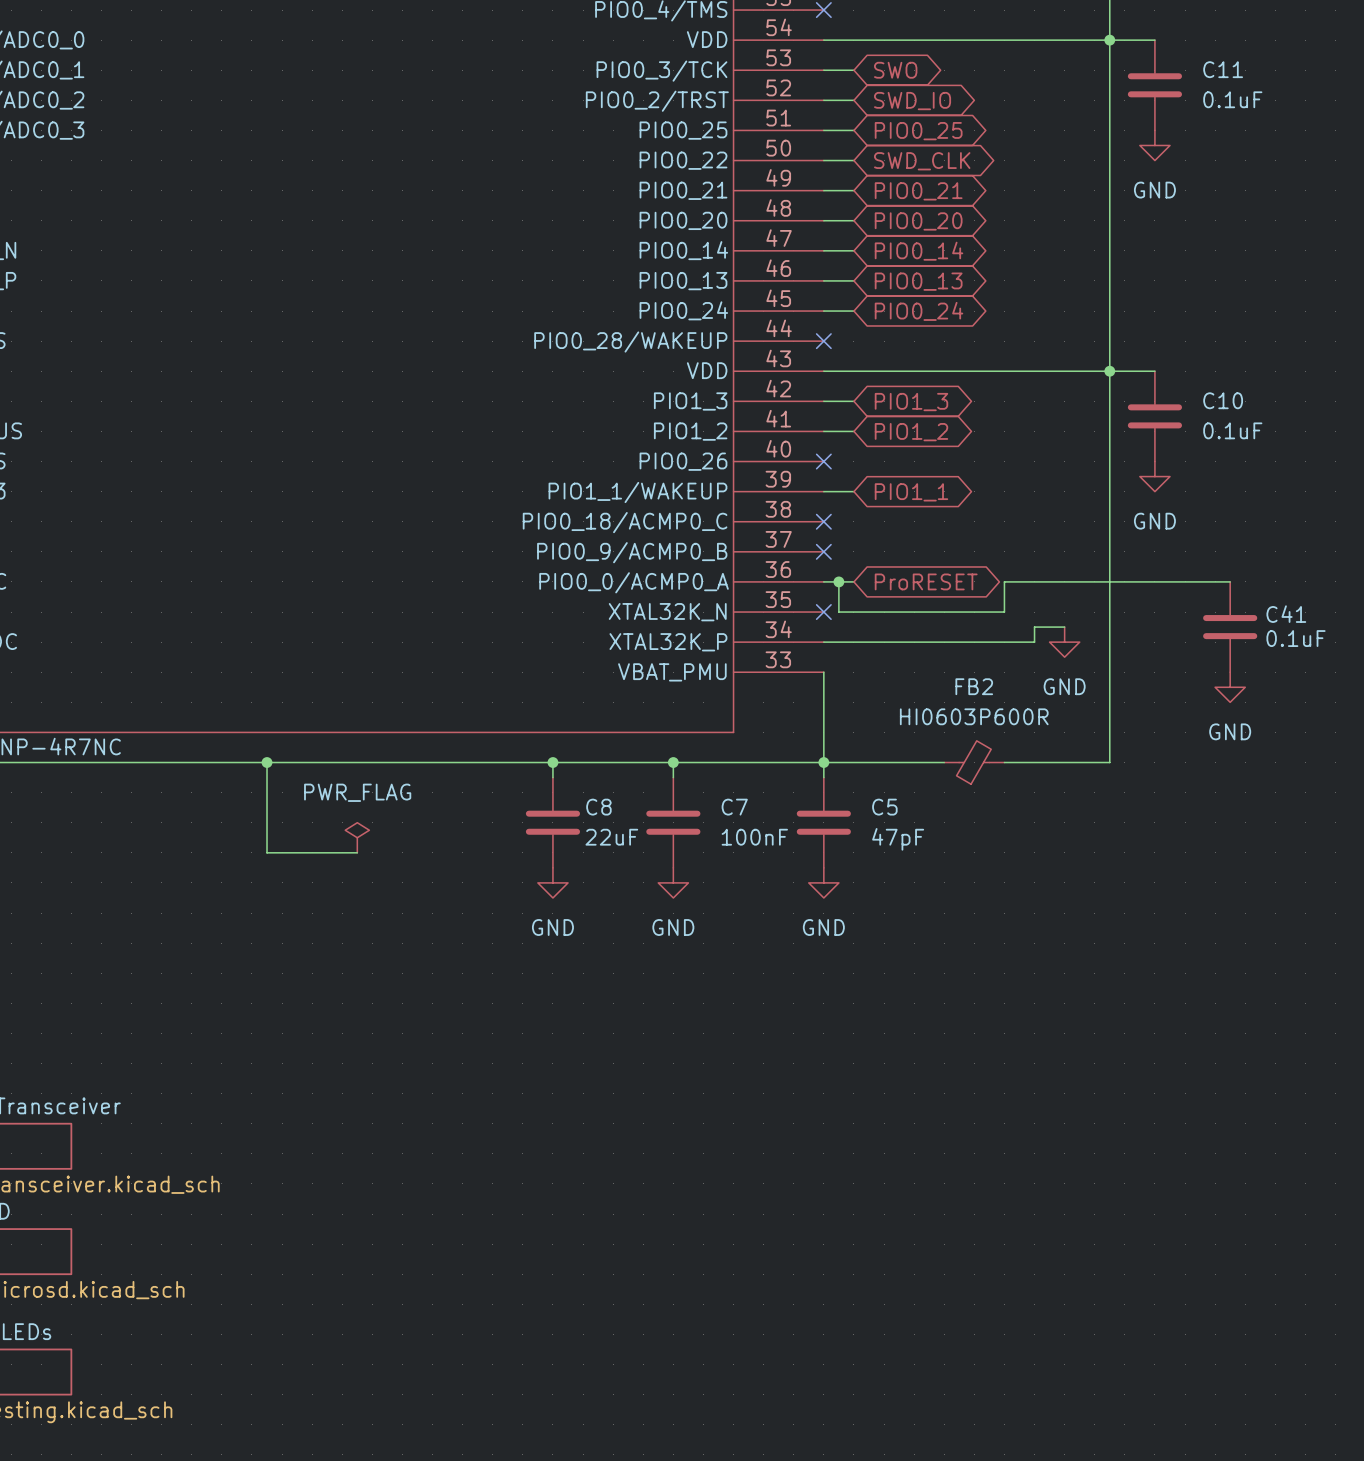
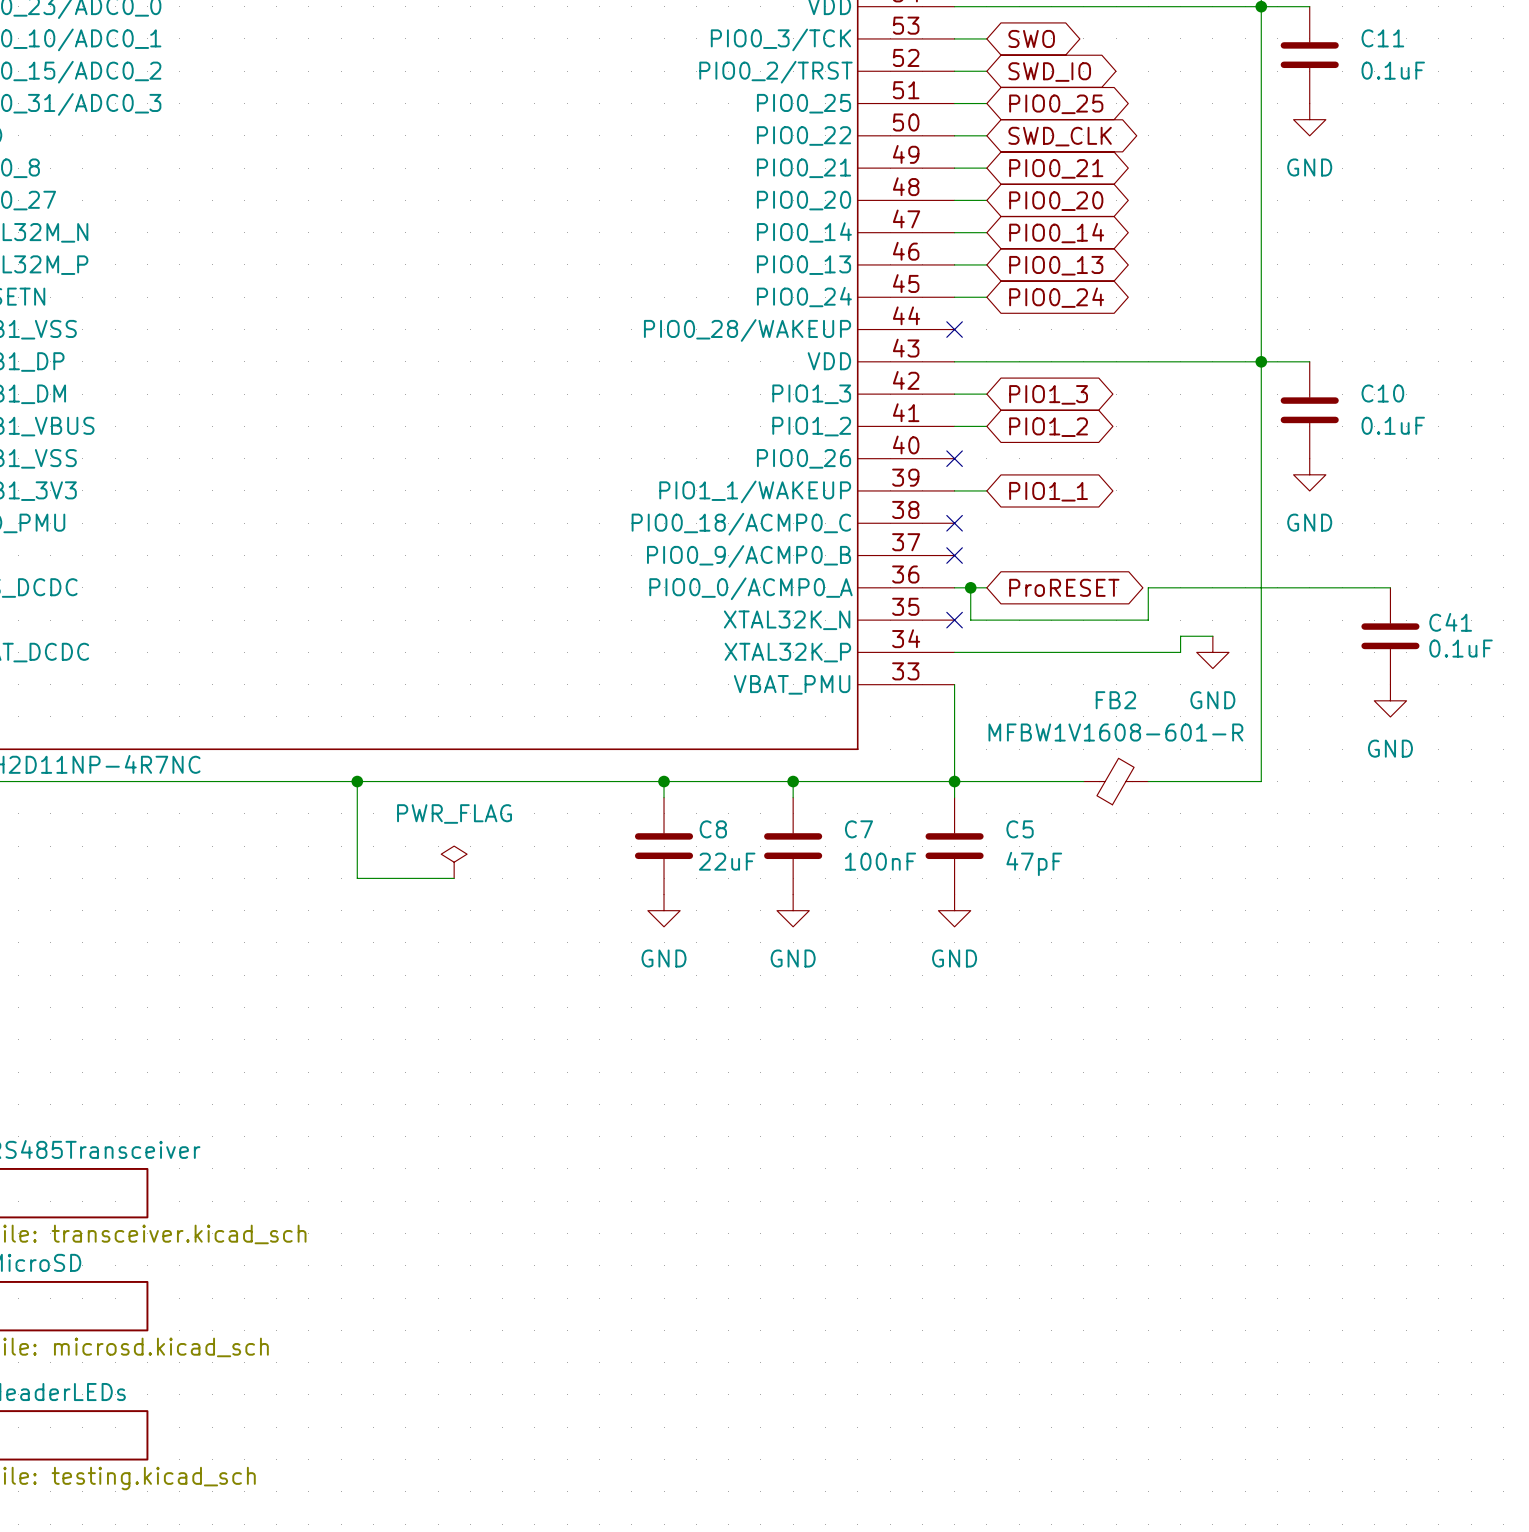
FB2 value: HI0603P600R (974, 716) -> MFBW1V1608-601-R (1115, 732)

